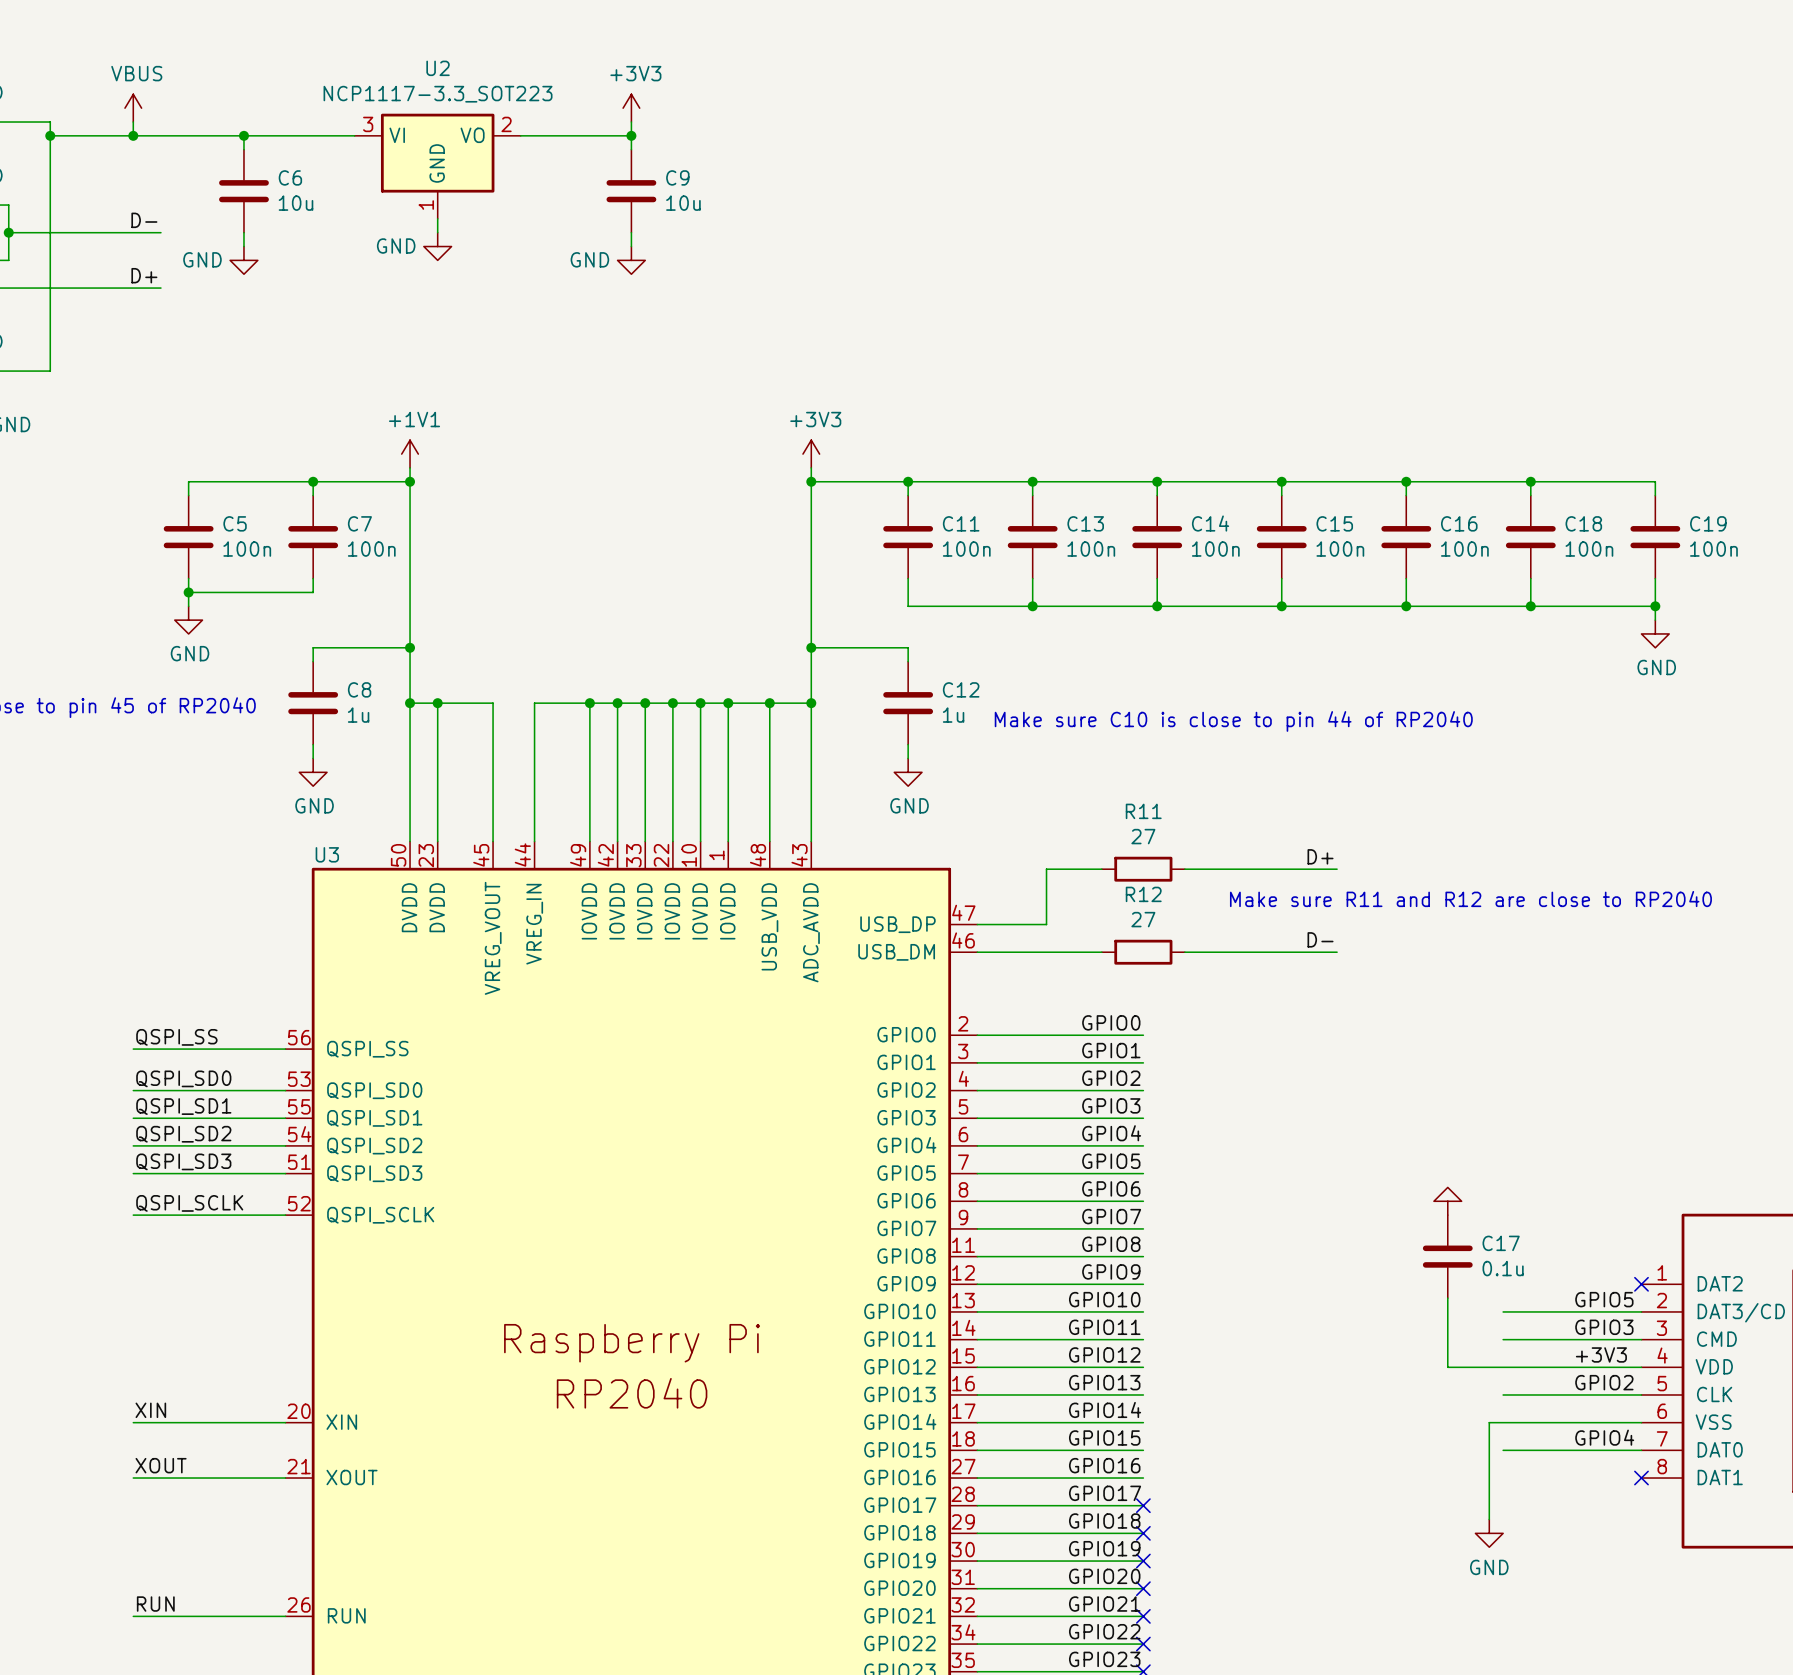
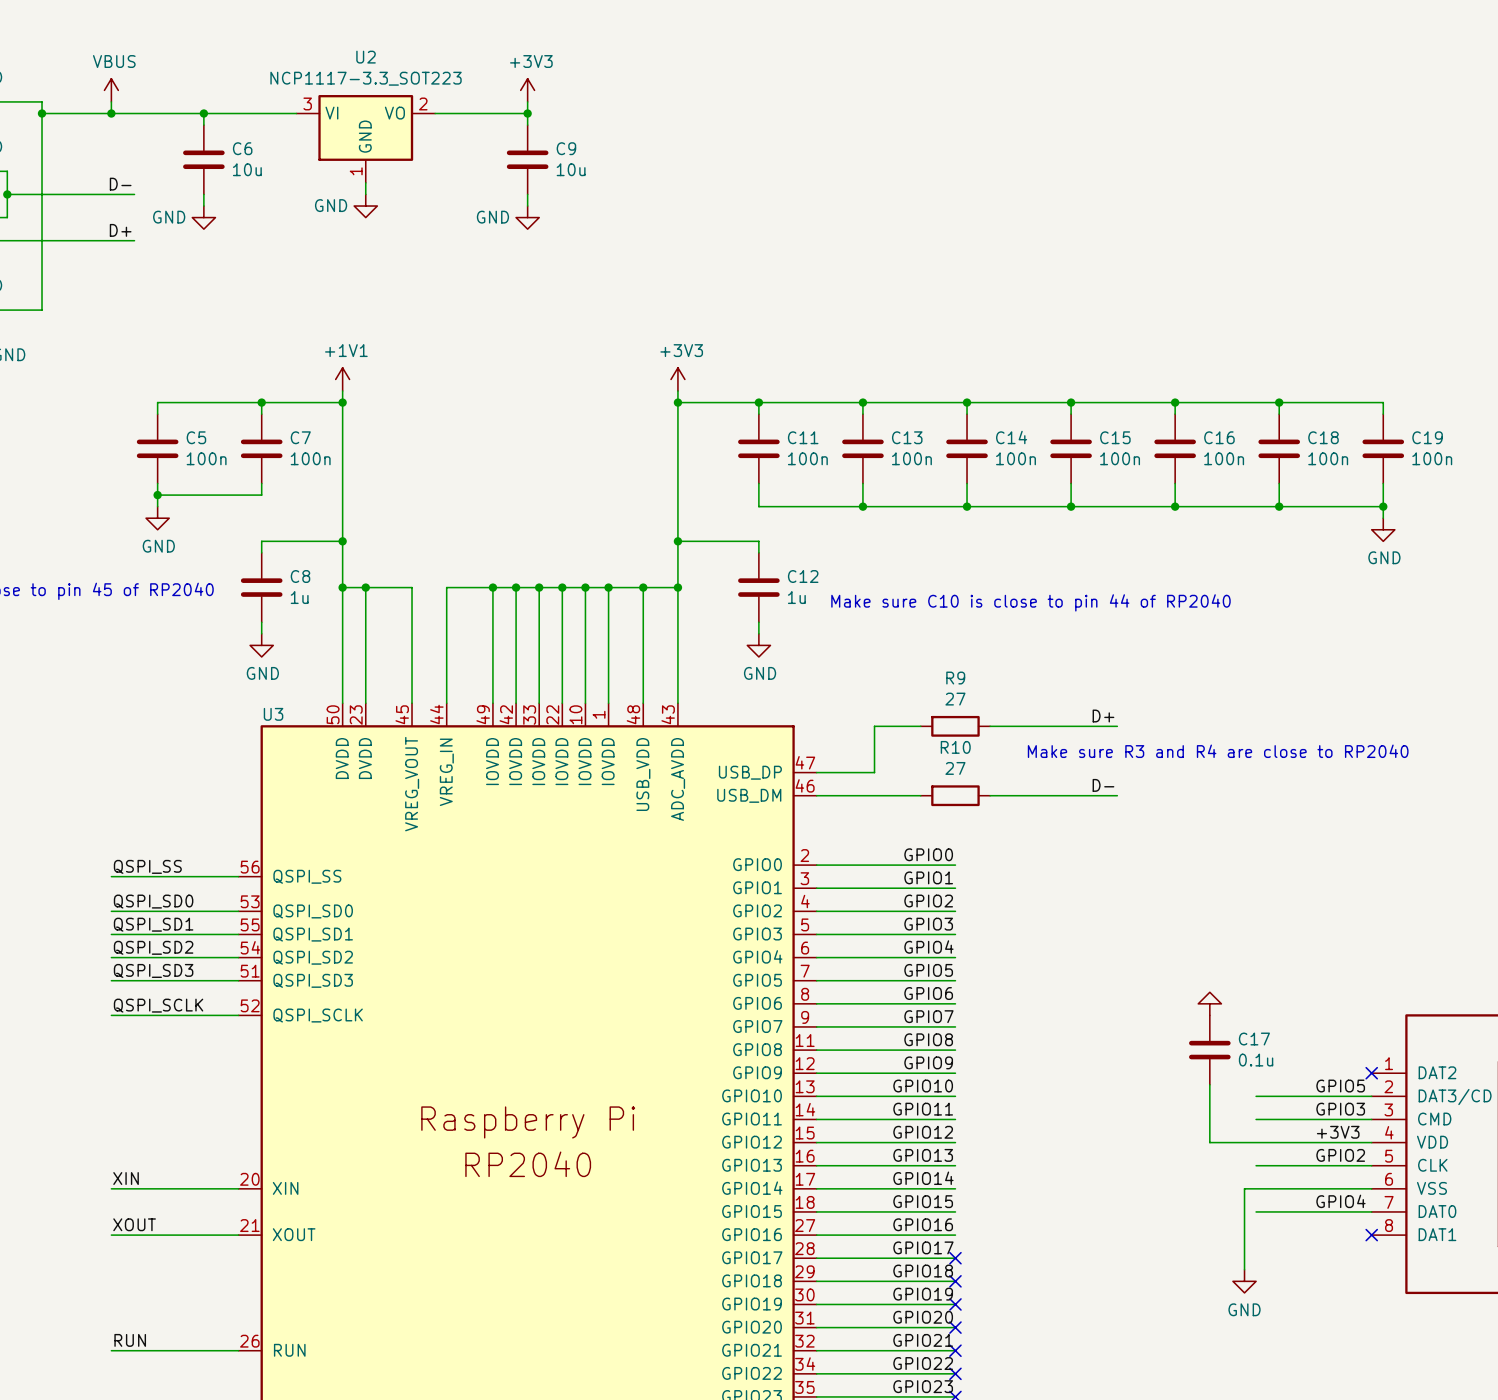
R11 name: R11 (1143, 811) -> R9 (955, 678)
R12 name: R12 (1143, 894) -> R10 (955, 747)
text: Make sure R11 and R12 are close to RP2040 (1470, 899) -> Make sure R3 and R4 are close to RP2040 (1218, 751)

